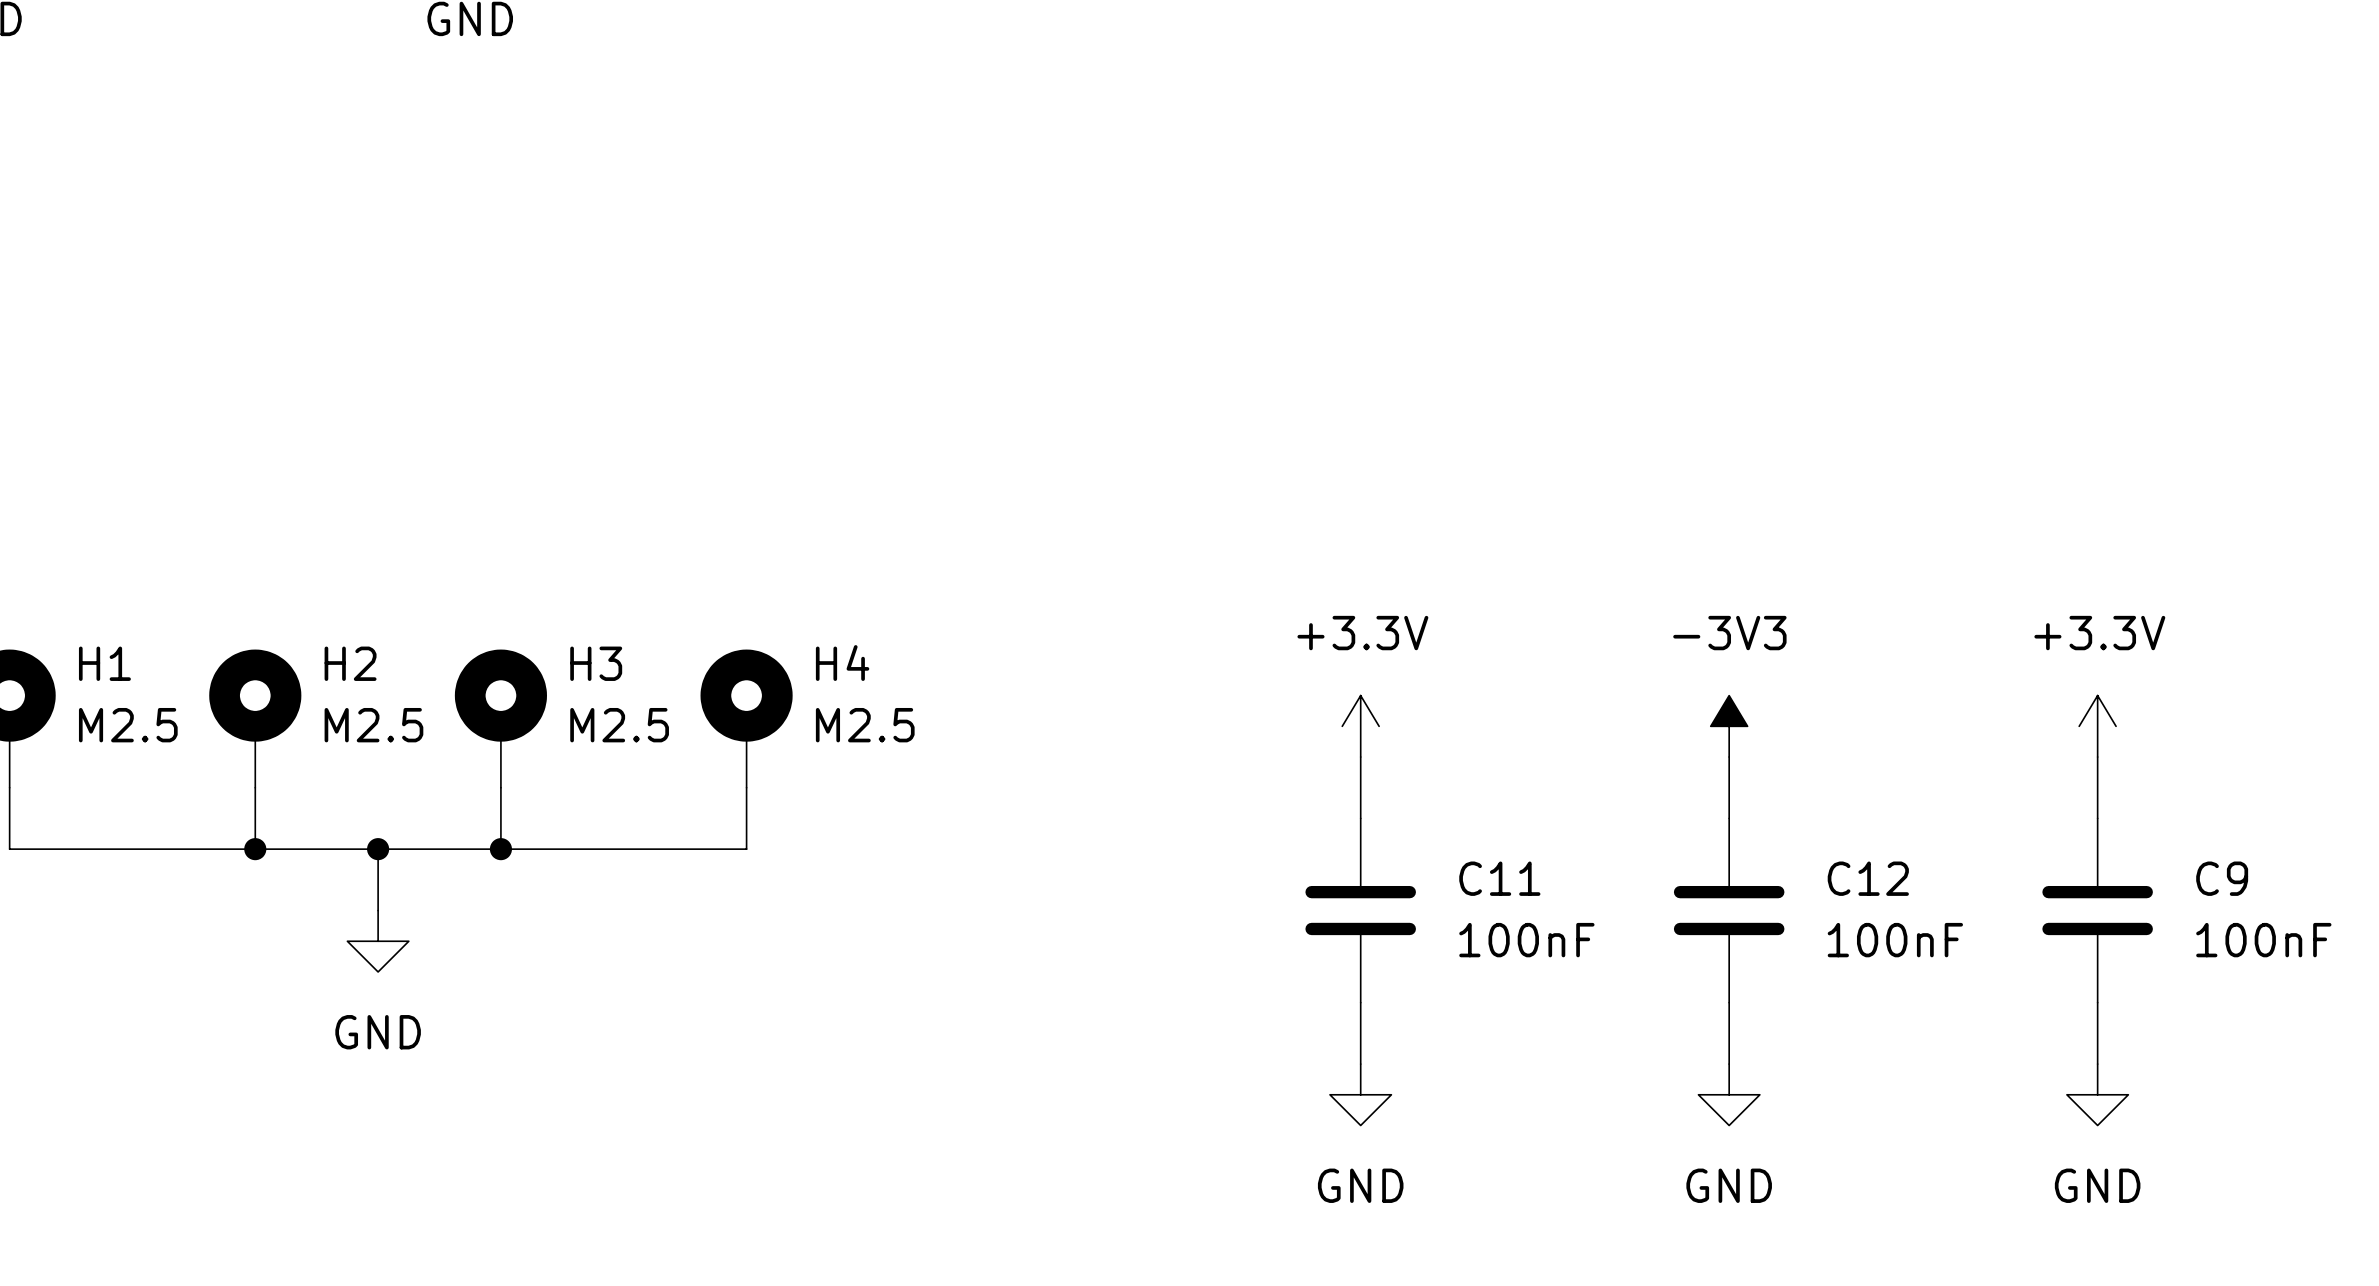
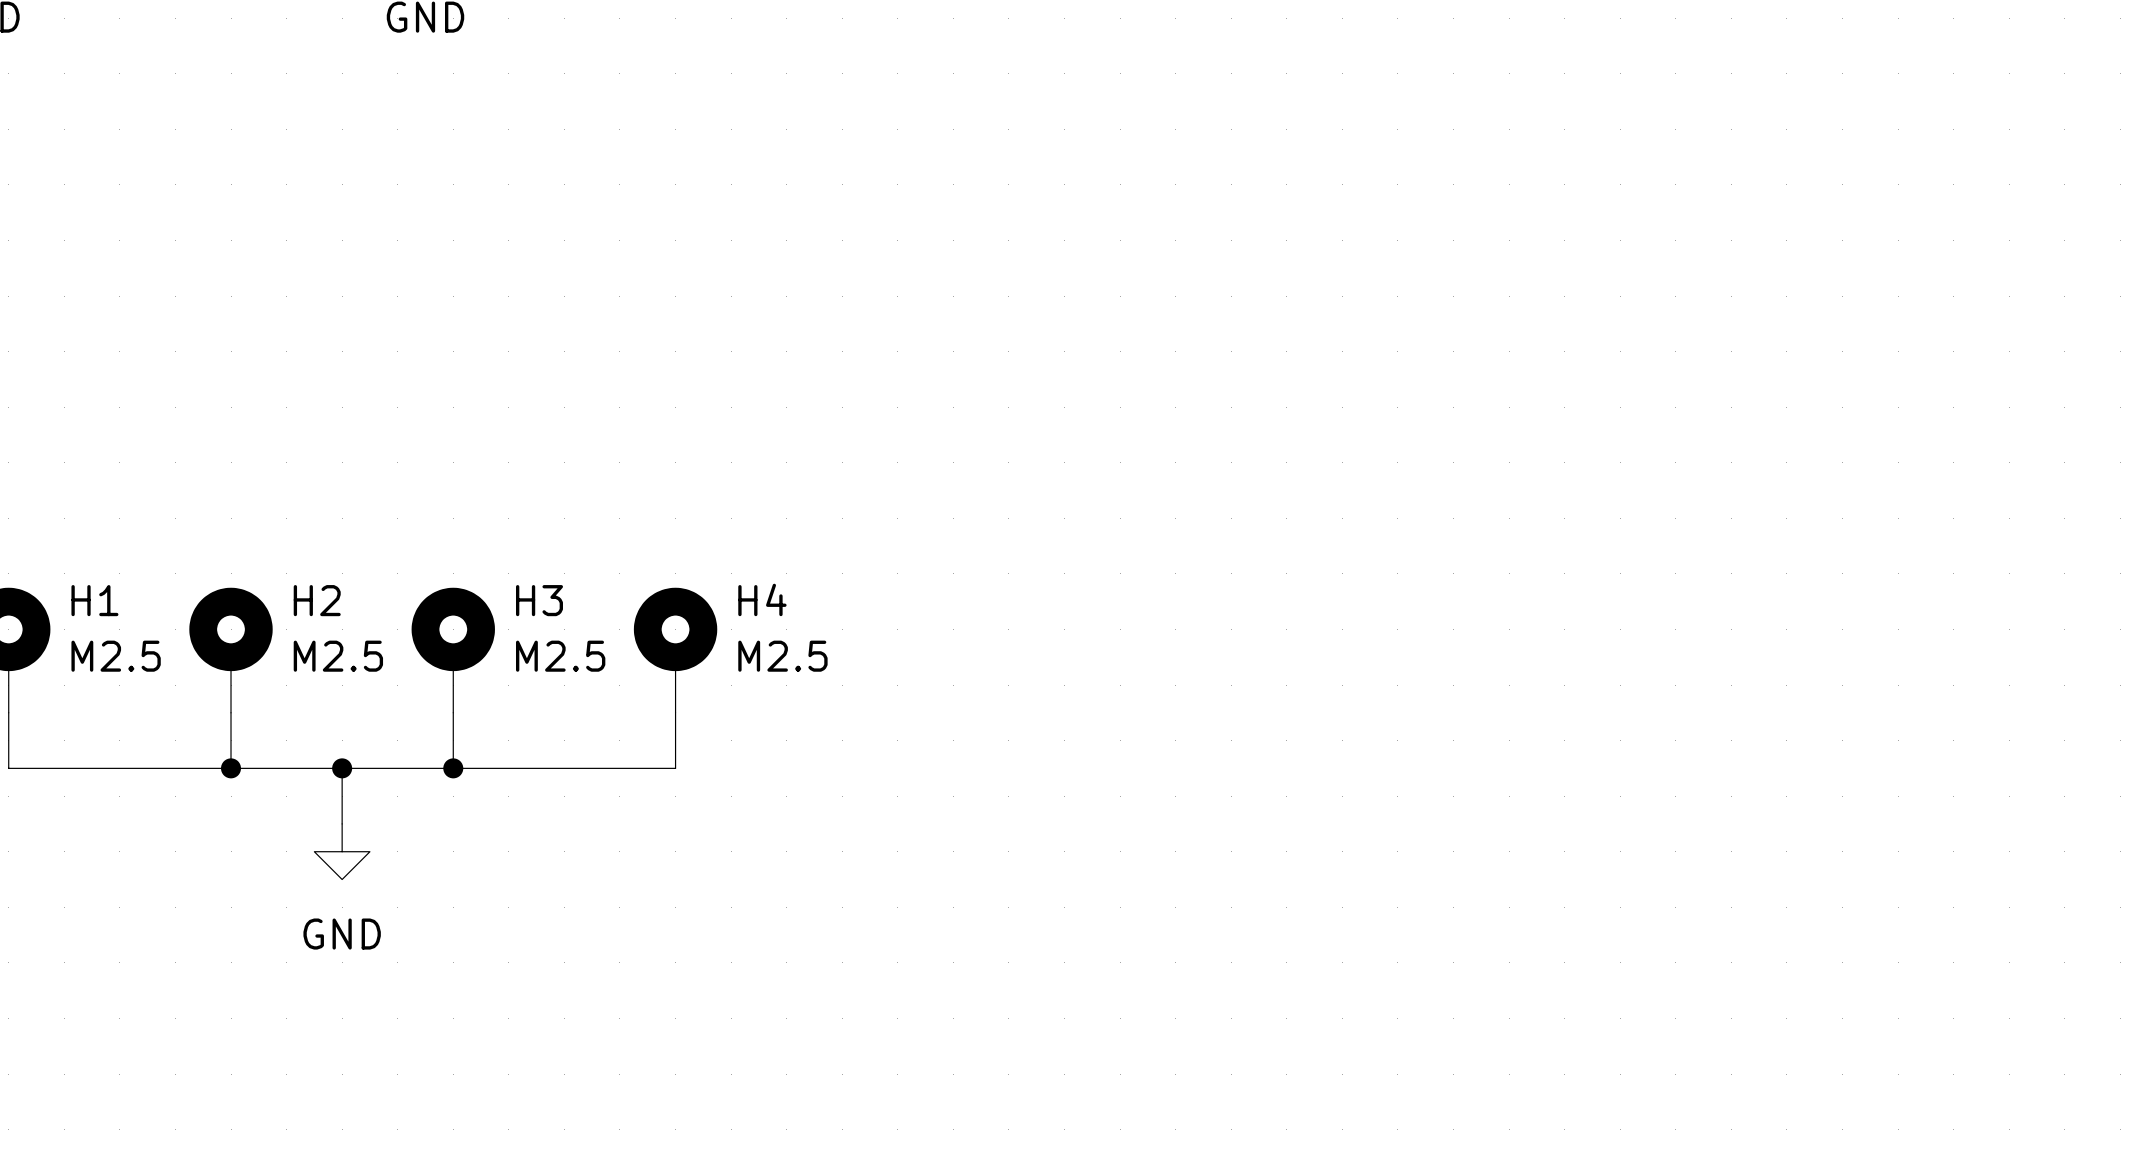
power symbol: +3.3V (1360, 726) -> none
power symbol: -3V3 (1729, 726) -> none
power symbol: +3.3V (2097, 726) -> none
wire: (1360, 757) (1360, 818) -> none
wire: (1729, 757) (1729, 818) -> none
wire: (2097, 757) (2097, 818) -> none
C11: 100nF (1360, 910) -> none
C12: 100nF (1729, 910) -> none
C9: 100nF (2097, 910) -> none
wire: (1360, 1002) (1360, 1064) -> none
wire: (1729, 1002) (1729, 1064) -> none
wire: (2097, 1002) (2097, 1064) -> none
power symbol: GND (1360, 1094) -> none
power symbol: GND (1729, 1094) -> none
power symbol: GND (2097, 1094) -> none

